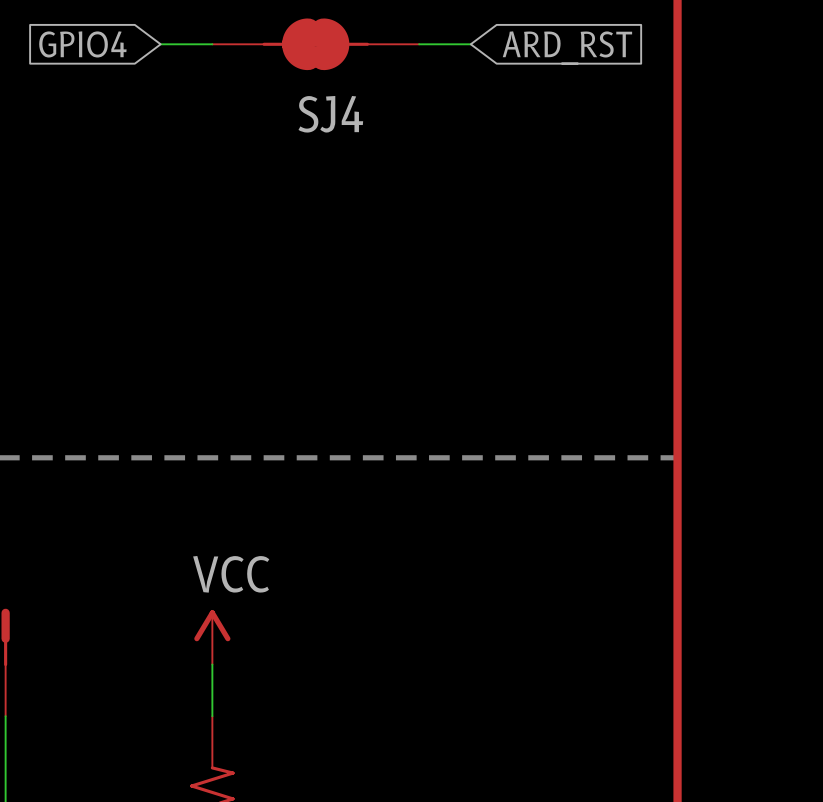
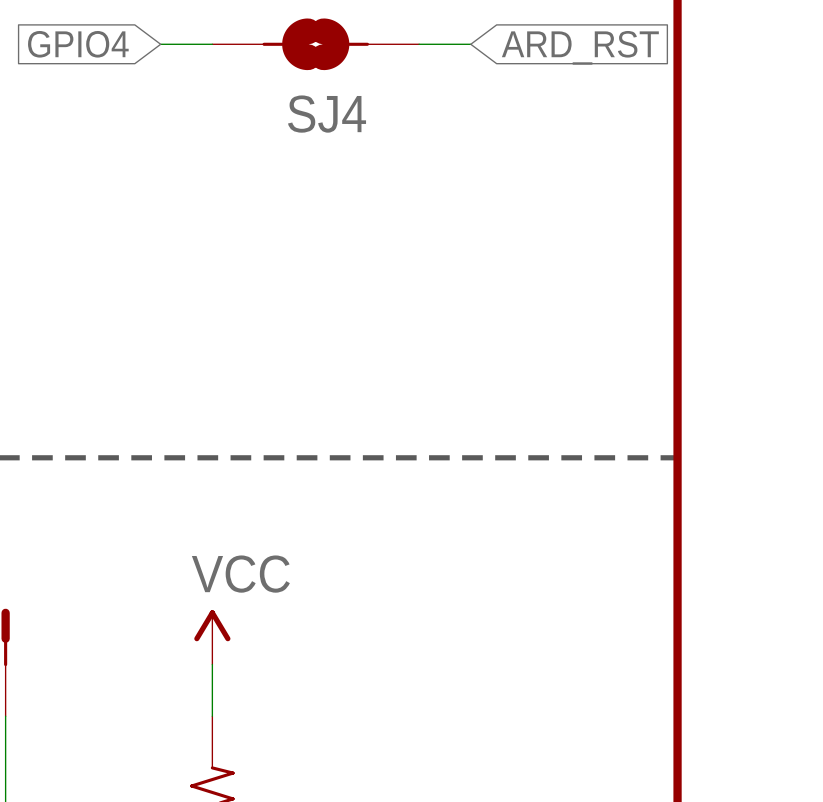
SJ4 symbol: [212, 18, 420, 71] -> [212, 18, 420, 71]

